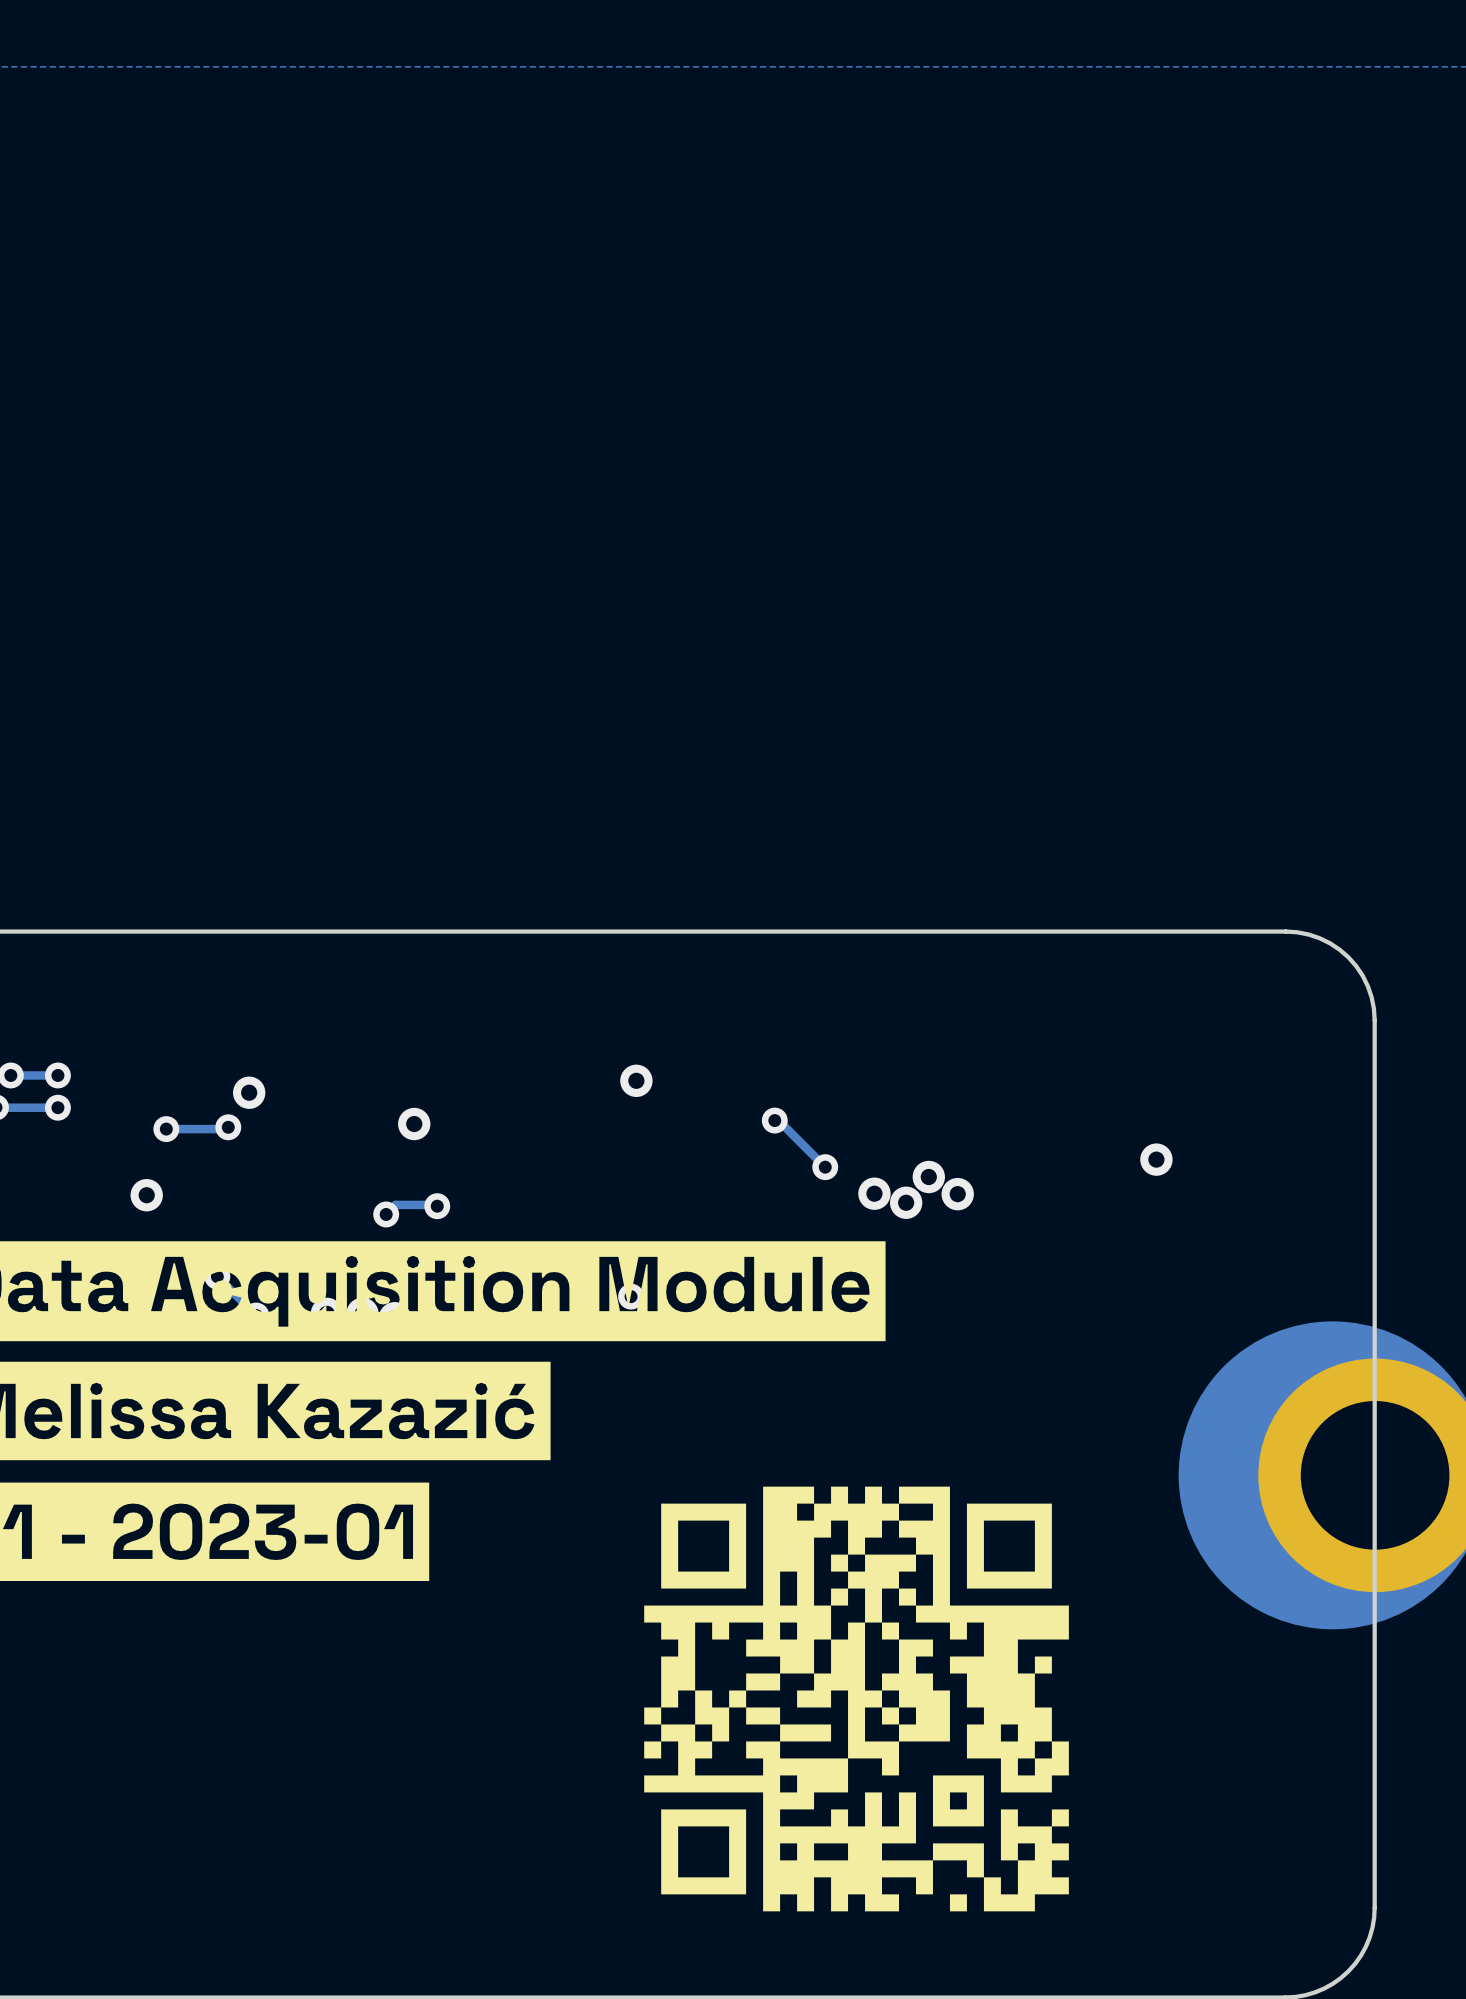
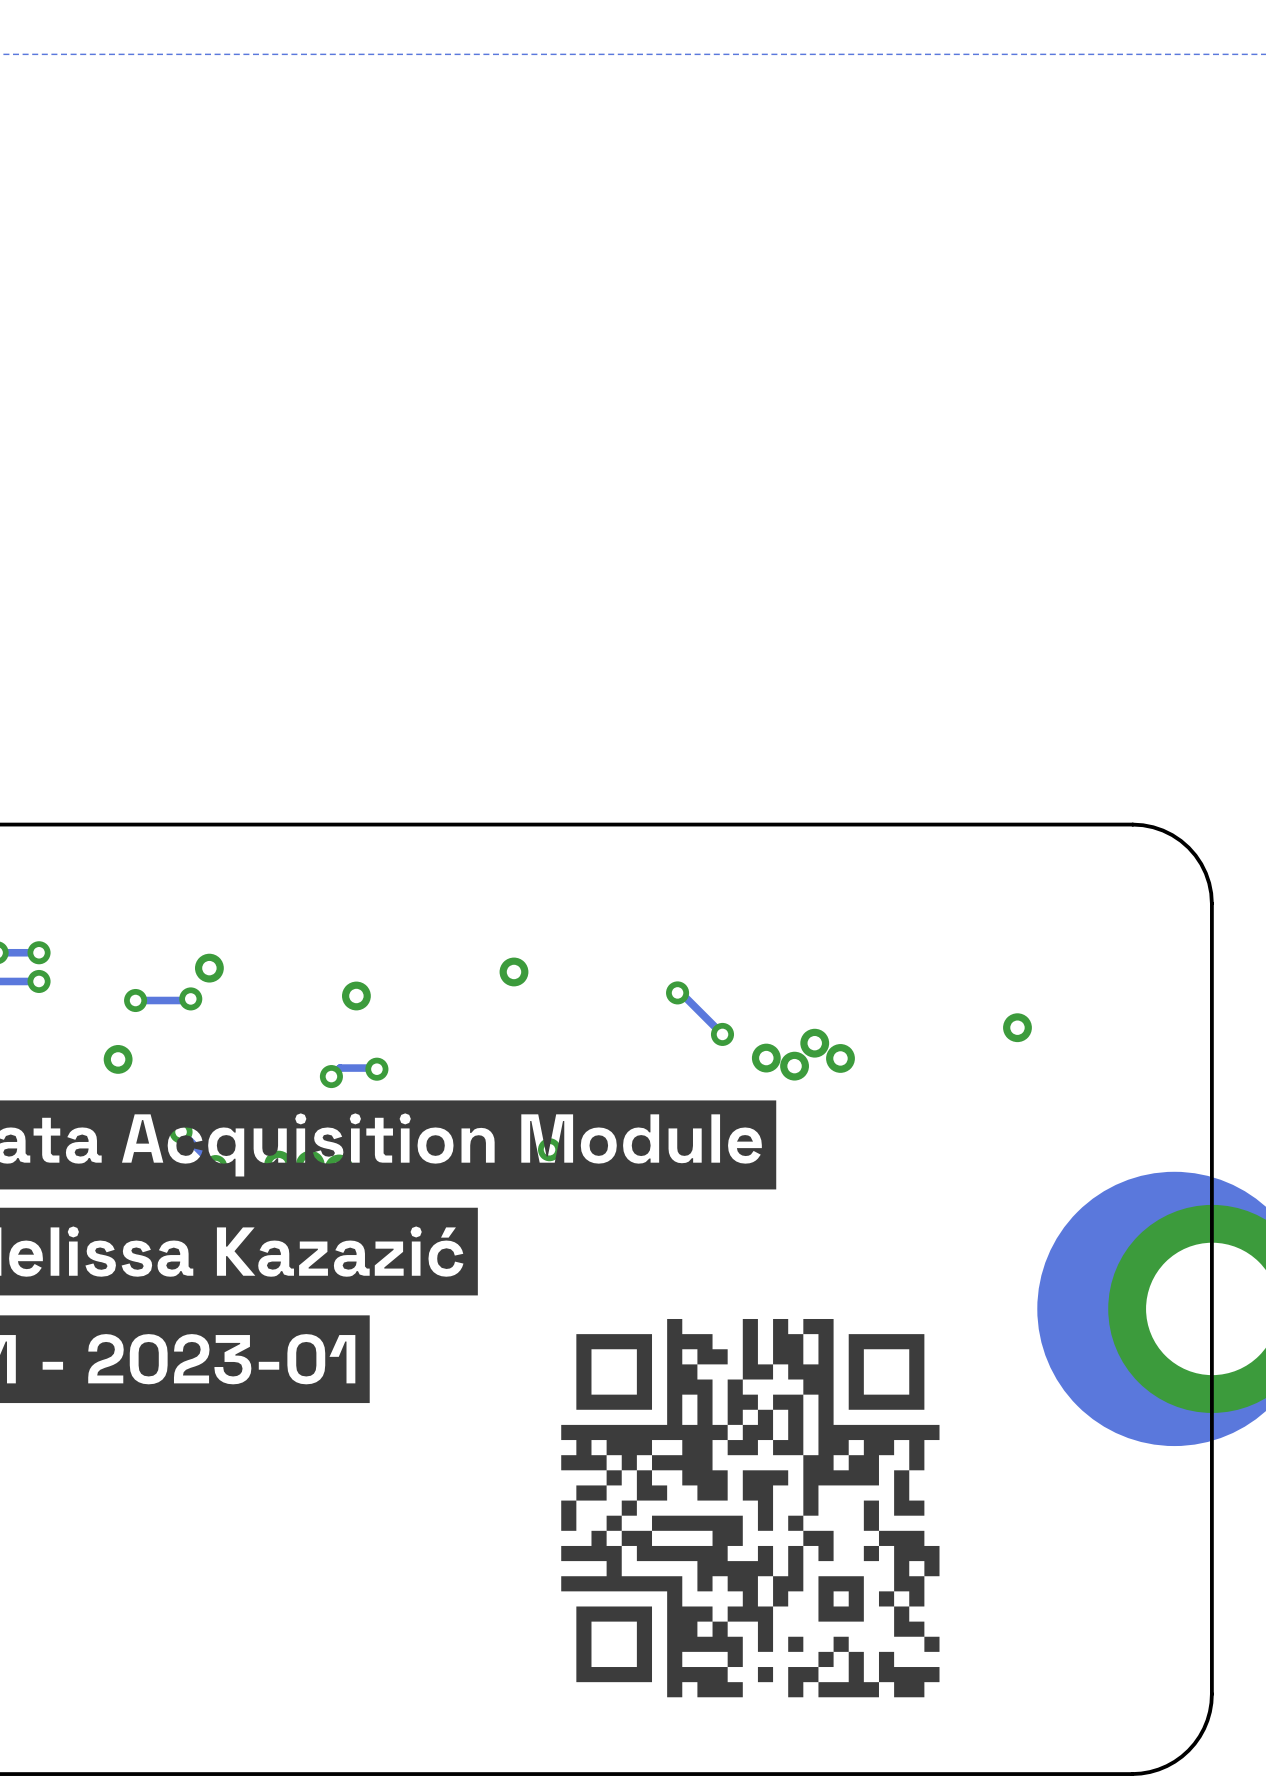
via position: (636, 1080) -> (513, 971)
drawing shape: [644, 1486, 1069, 1912] -> [561, 1318, 940, 1698]

